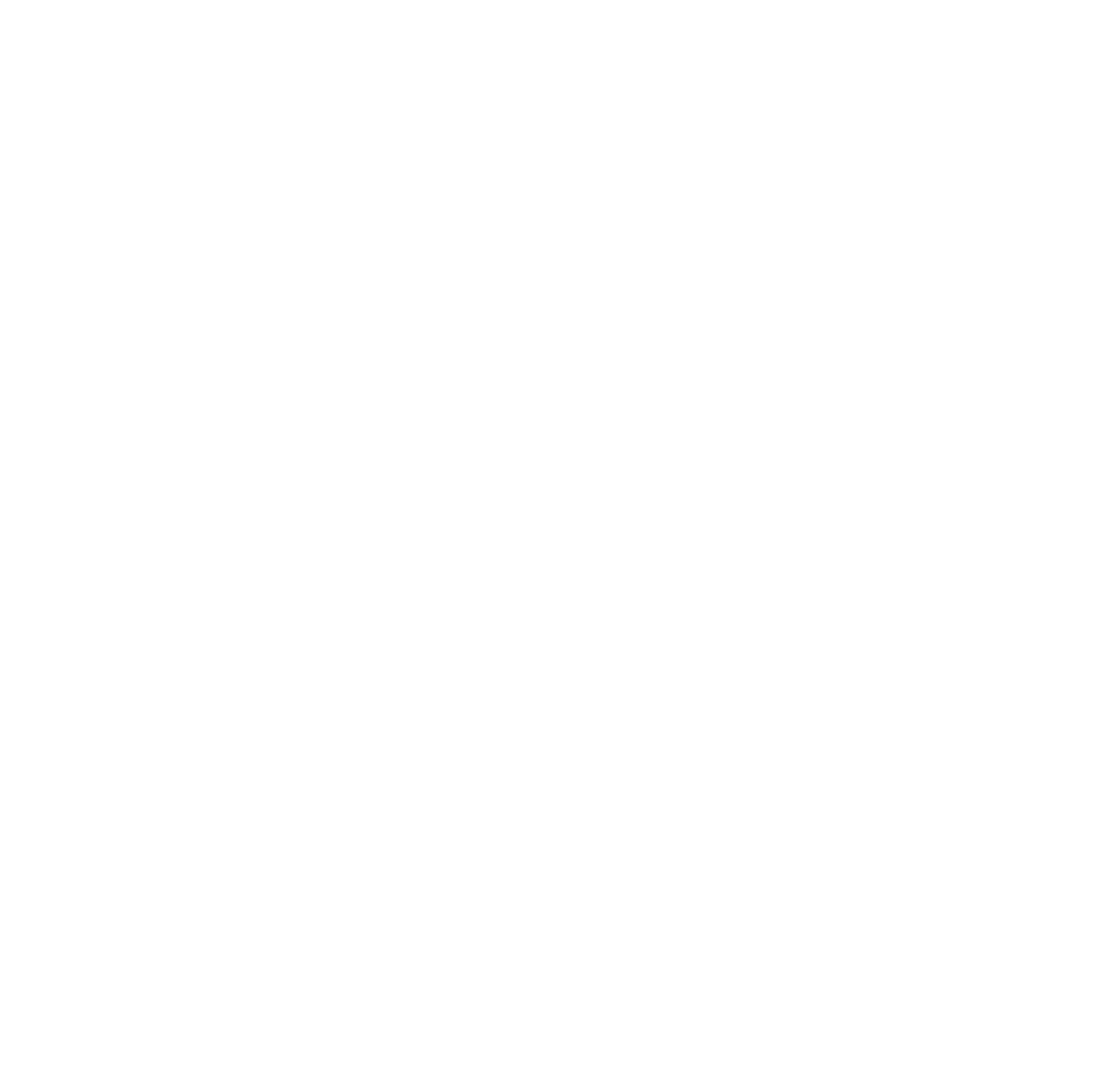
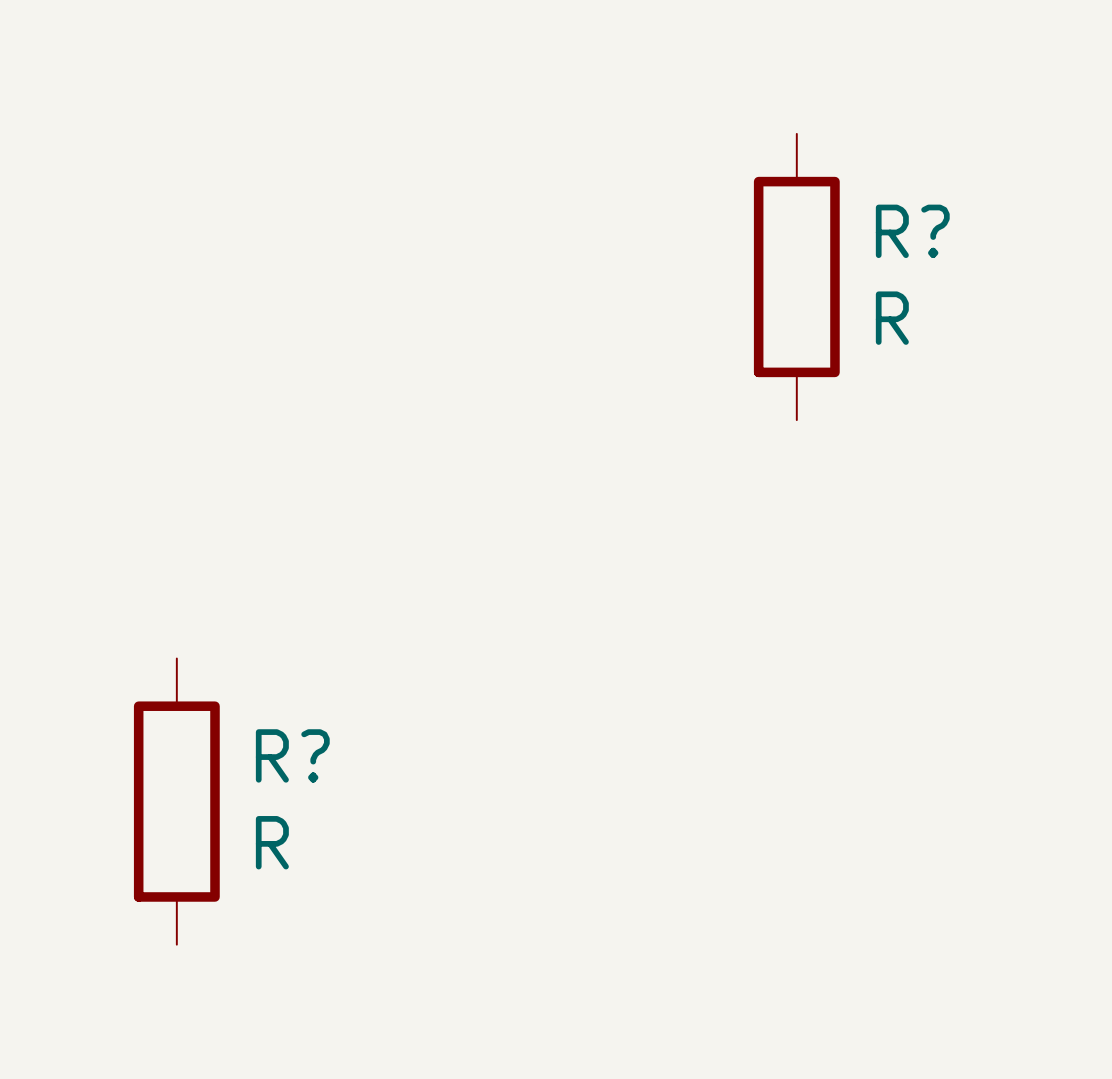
R?: none -> R (796, 276)
R?: none -> R (176, 801)

